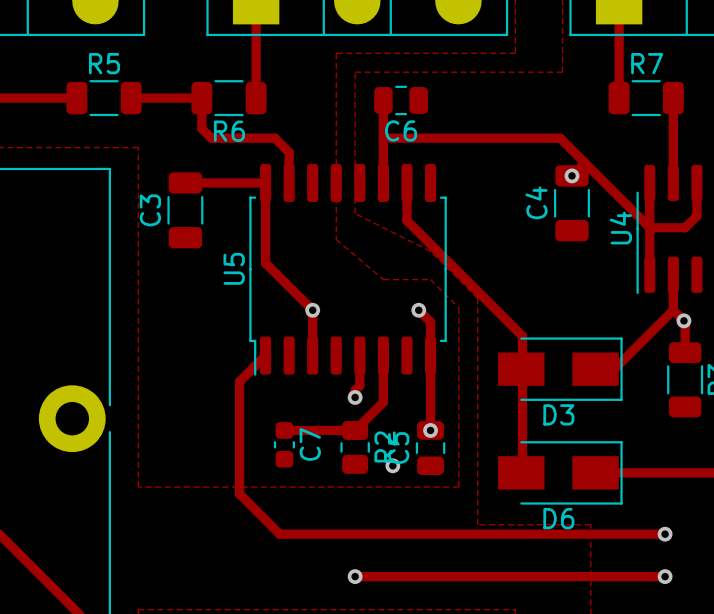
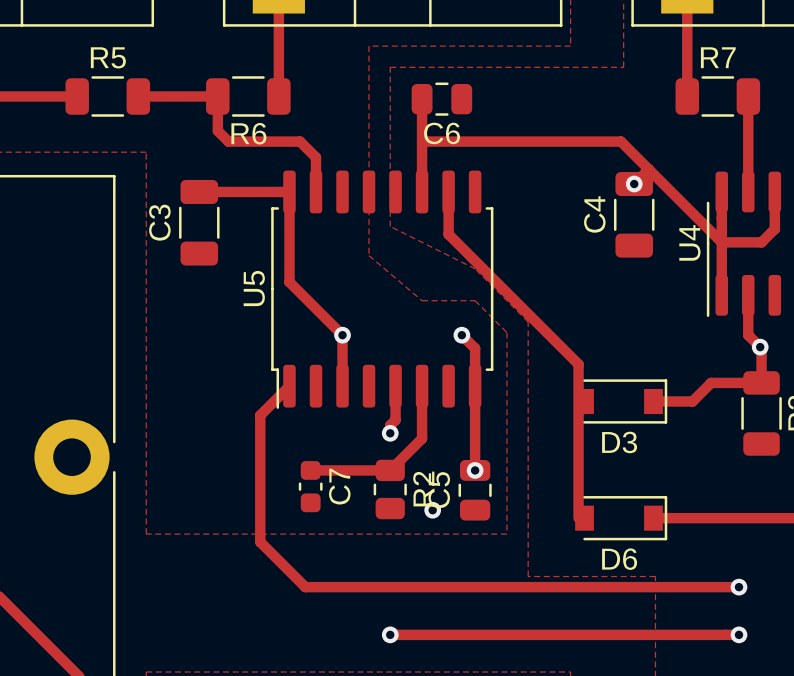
track: (673, 310) (614, 369) -> (761, 382) (711, 382) (692, 401) (681, 401)
D3 footprint: [498, 337, 623, 401] -> [575, 379, 668, 424]
D6 footprint: [498, 441, 623, 505] -> [575, 496, 668, 541]

